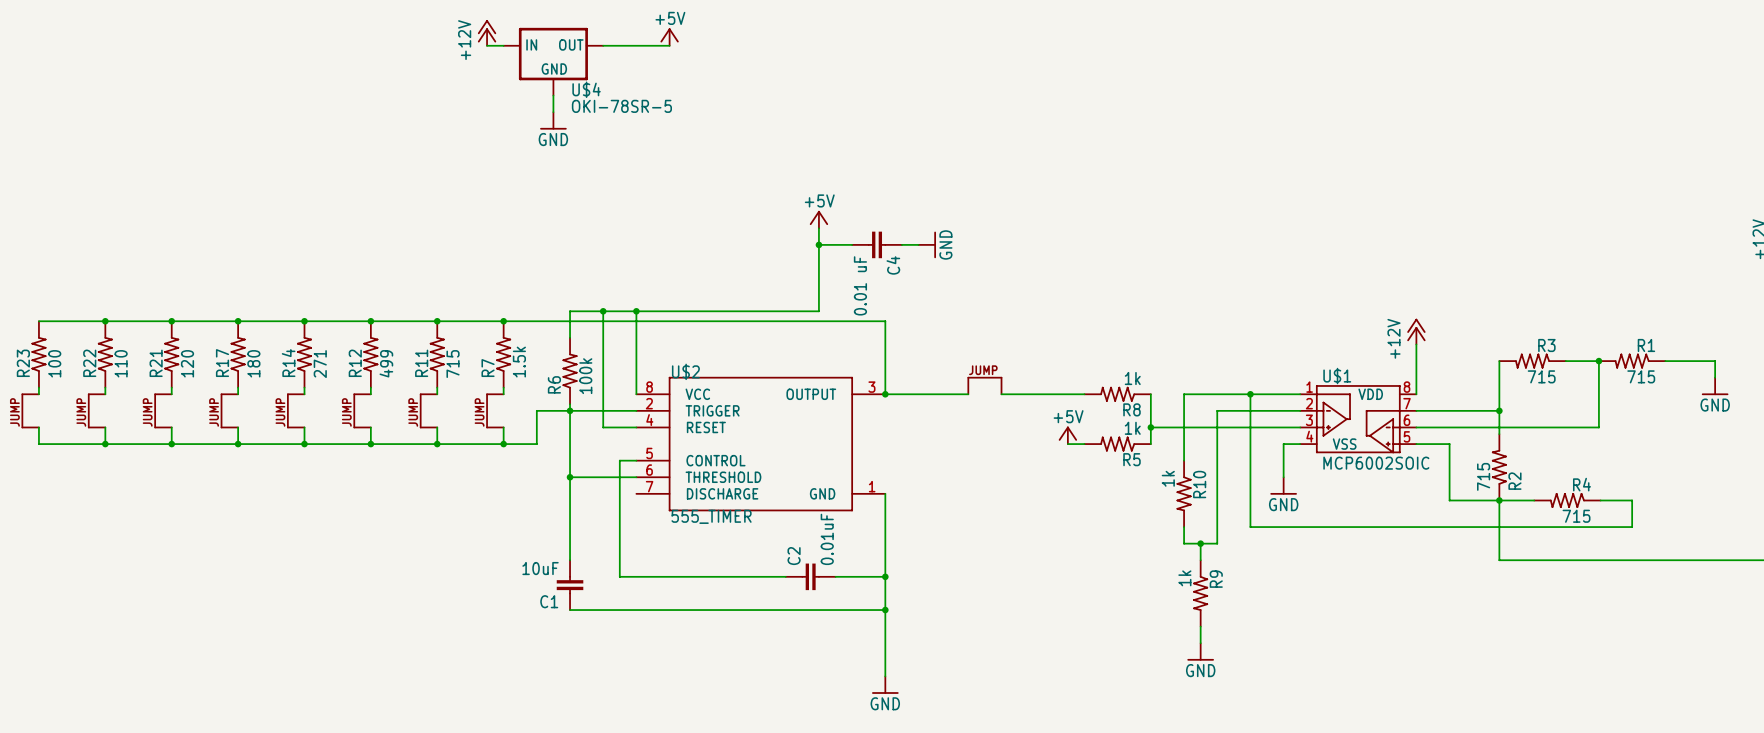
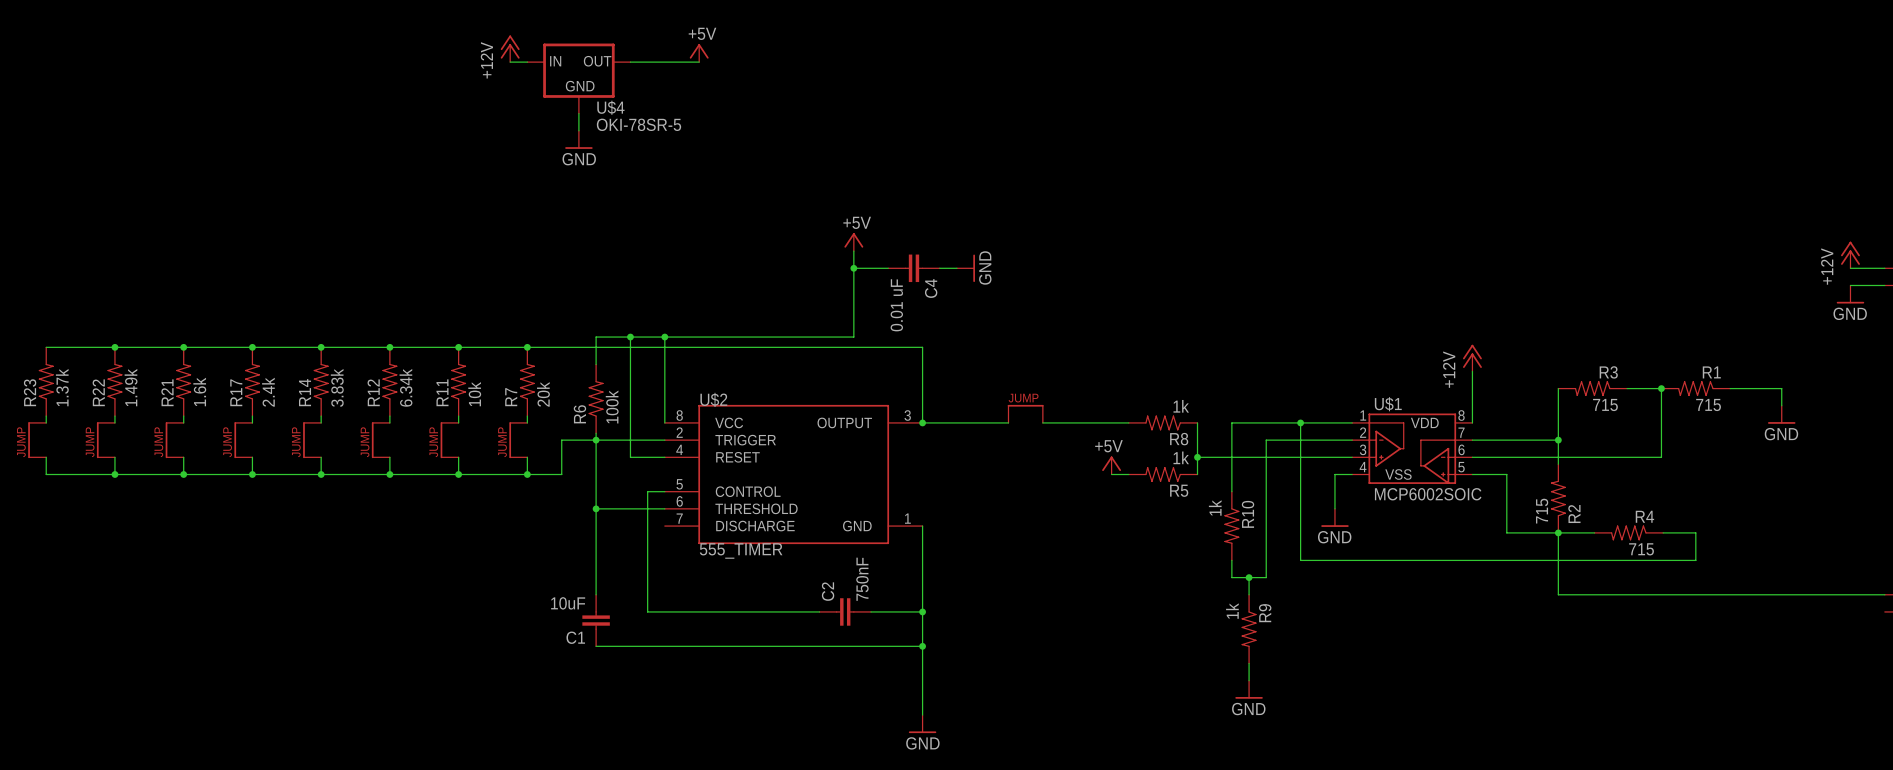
R7 value: 1.5k (519, 362) -> 20k (543, 394)
R23 value: 100 (54, 363) -> 1.37k (62, 387)
R22 value: 110 (121, 363) -> 1.49k (131, 387)
R21 value: 120 (187, 363) -> 1.6k (199, 392)
R17 value: 180 (253, 363) -> 2.4k (268, 392)
R12 value: 499 (386, 363) -> 6.34k (405, 387)
R14 value: 271 (320, 364) -> 3.83k (337, 387)
R11 value: 715 (453, 364) -> 10k (474, 394)
C2 value: 0.01uF (827, 539) -> 750nF (862, 579)

